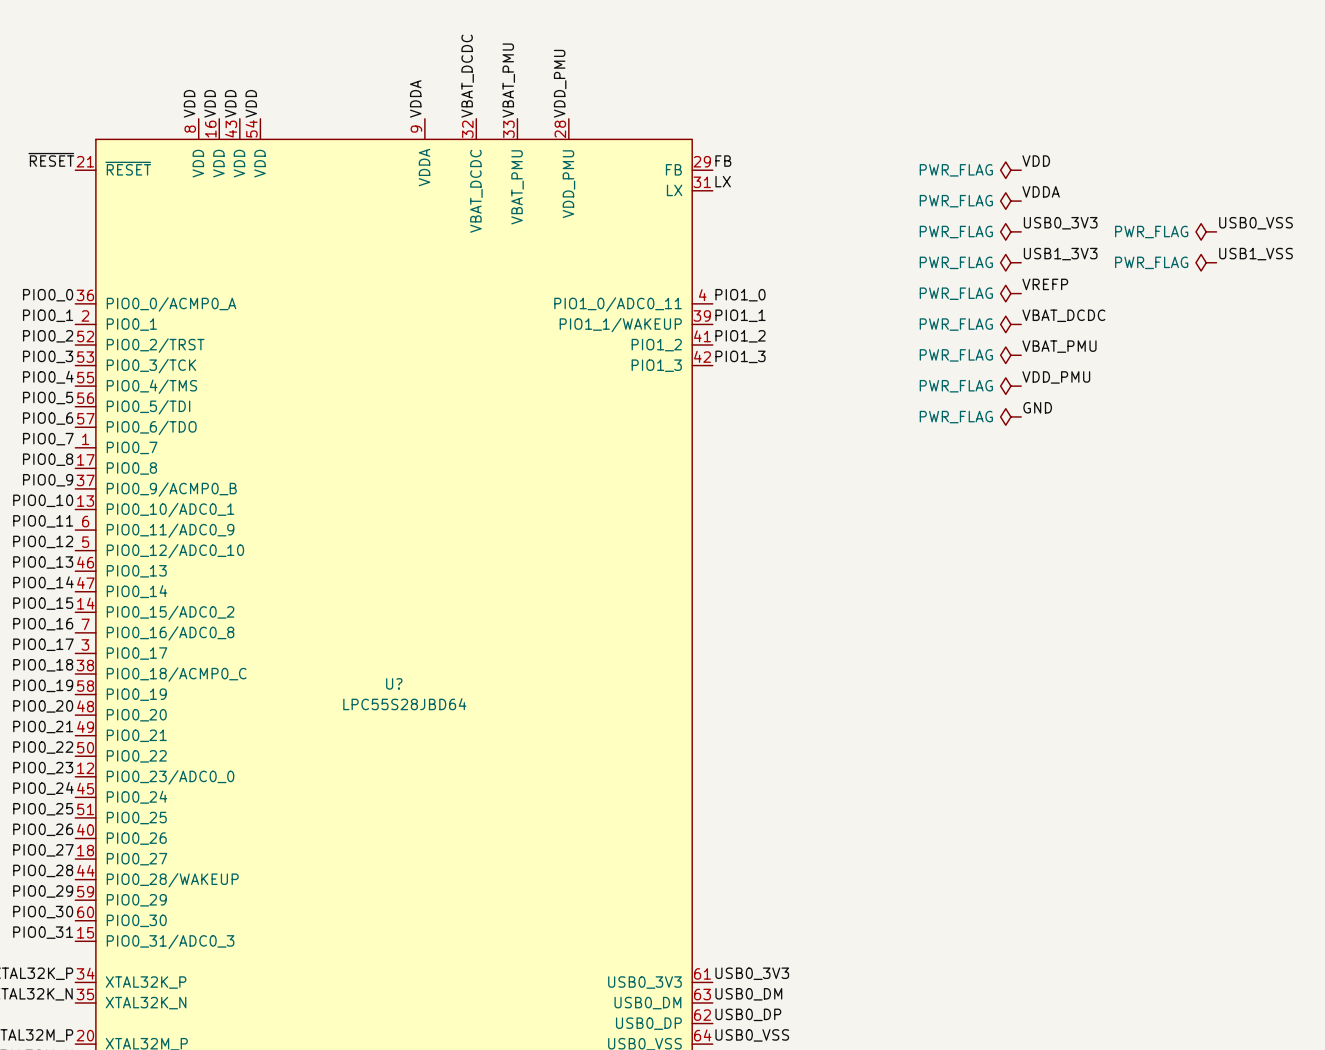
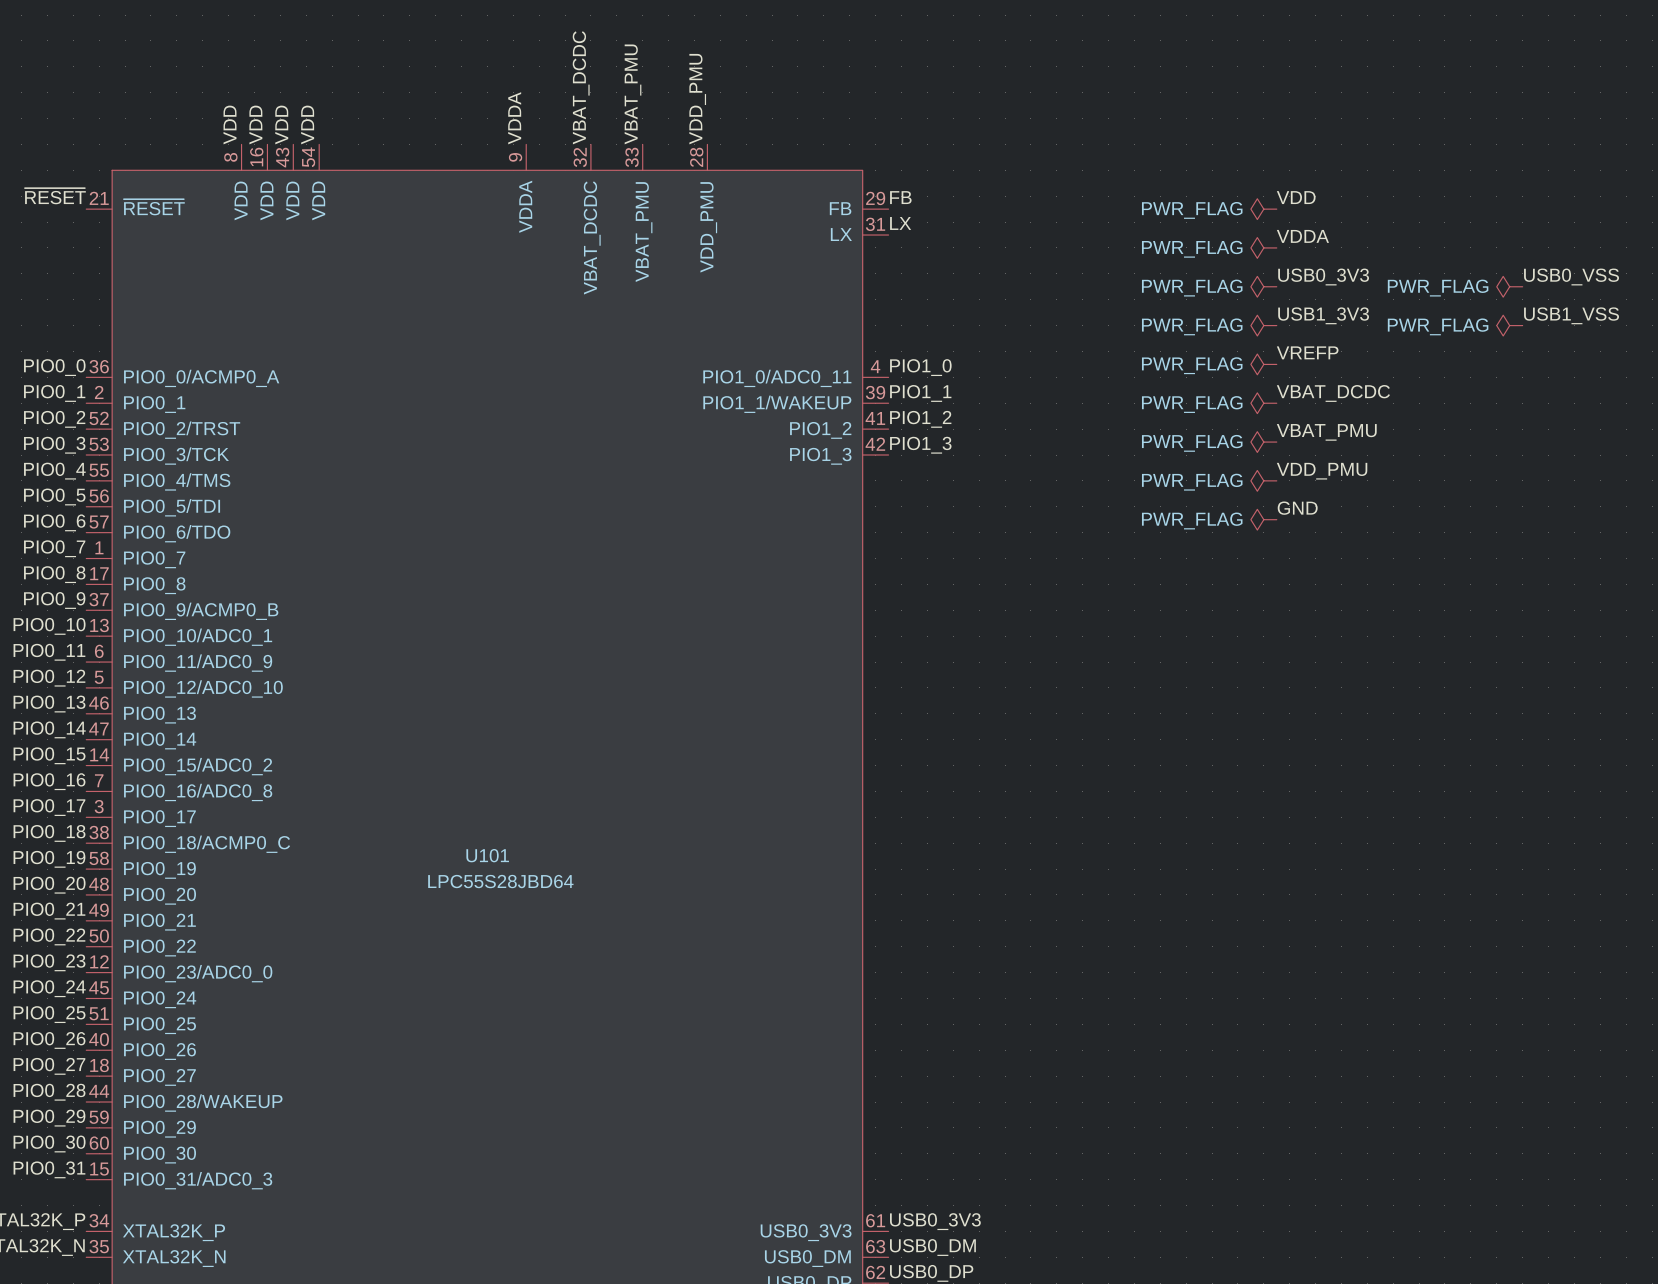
U? name: U? (394, 683) -> U101 (487, 855)

